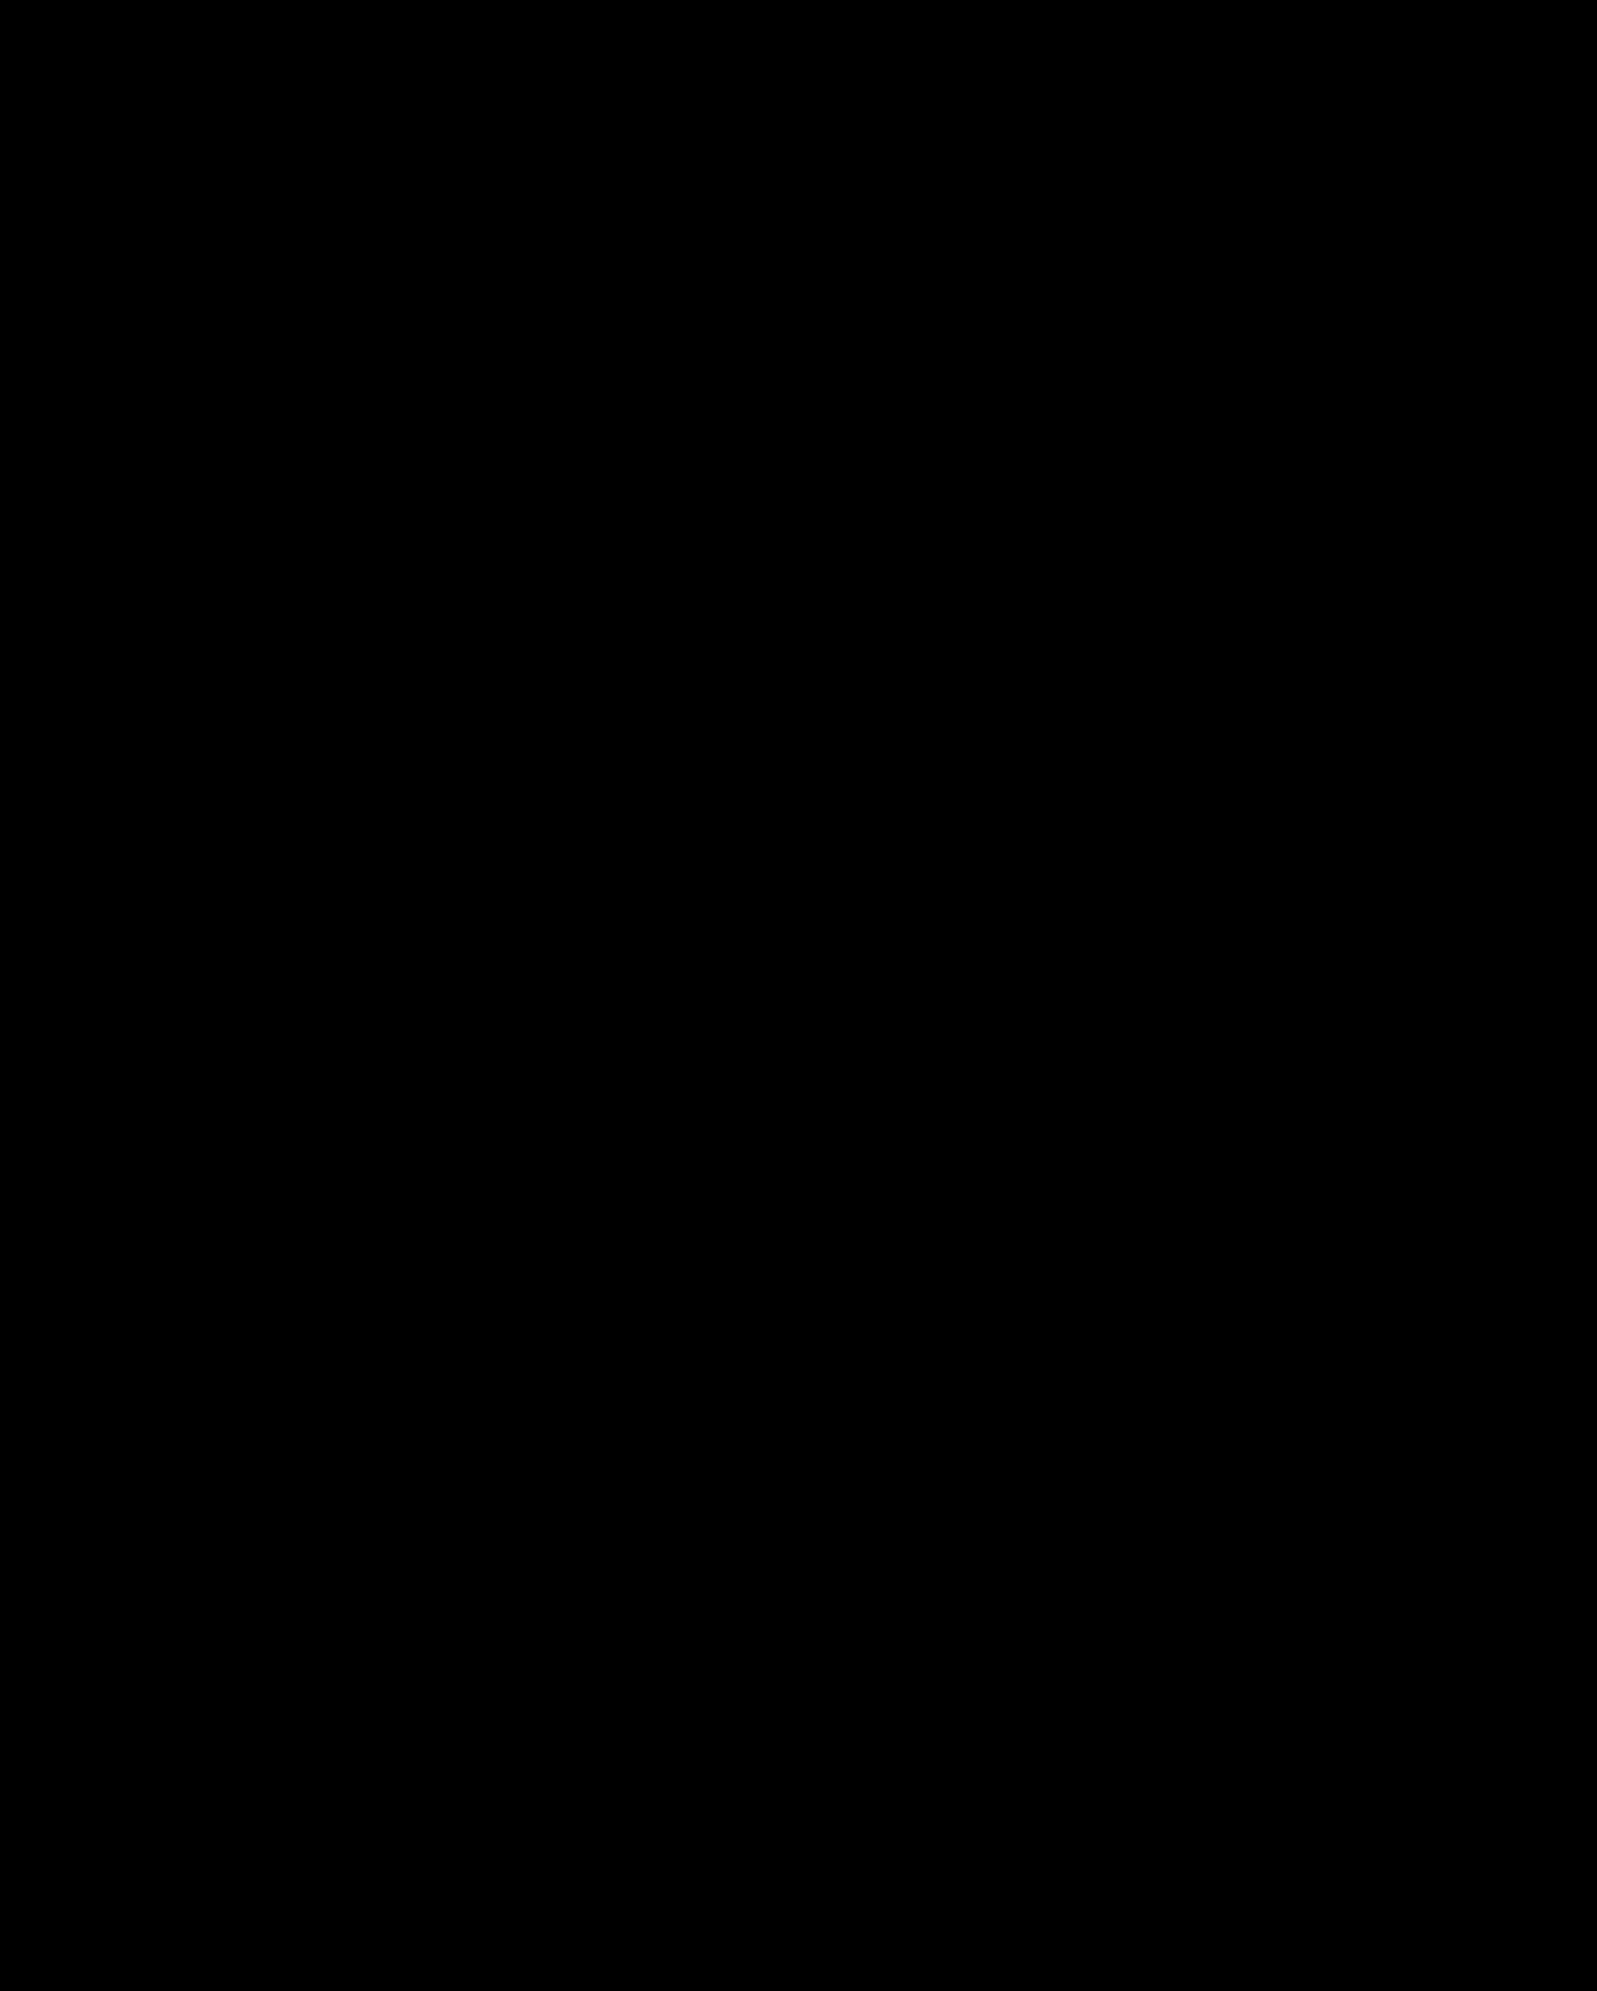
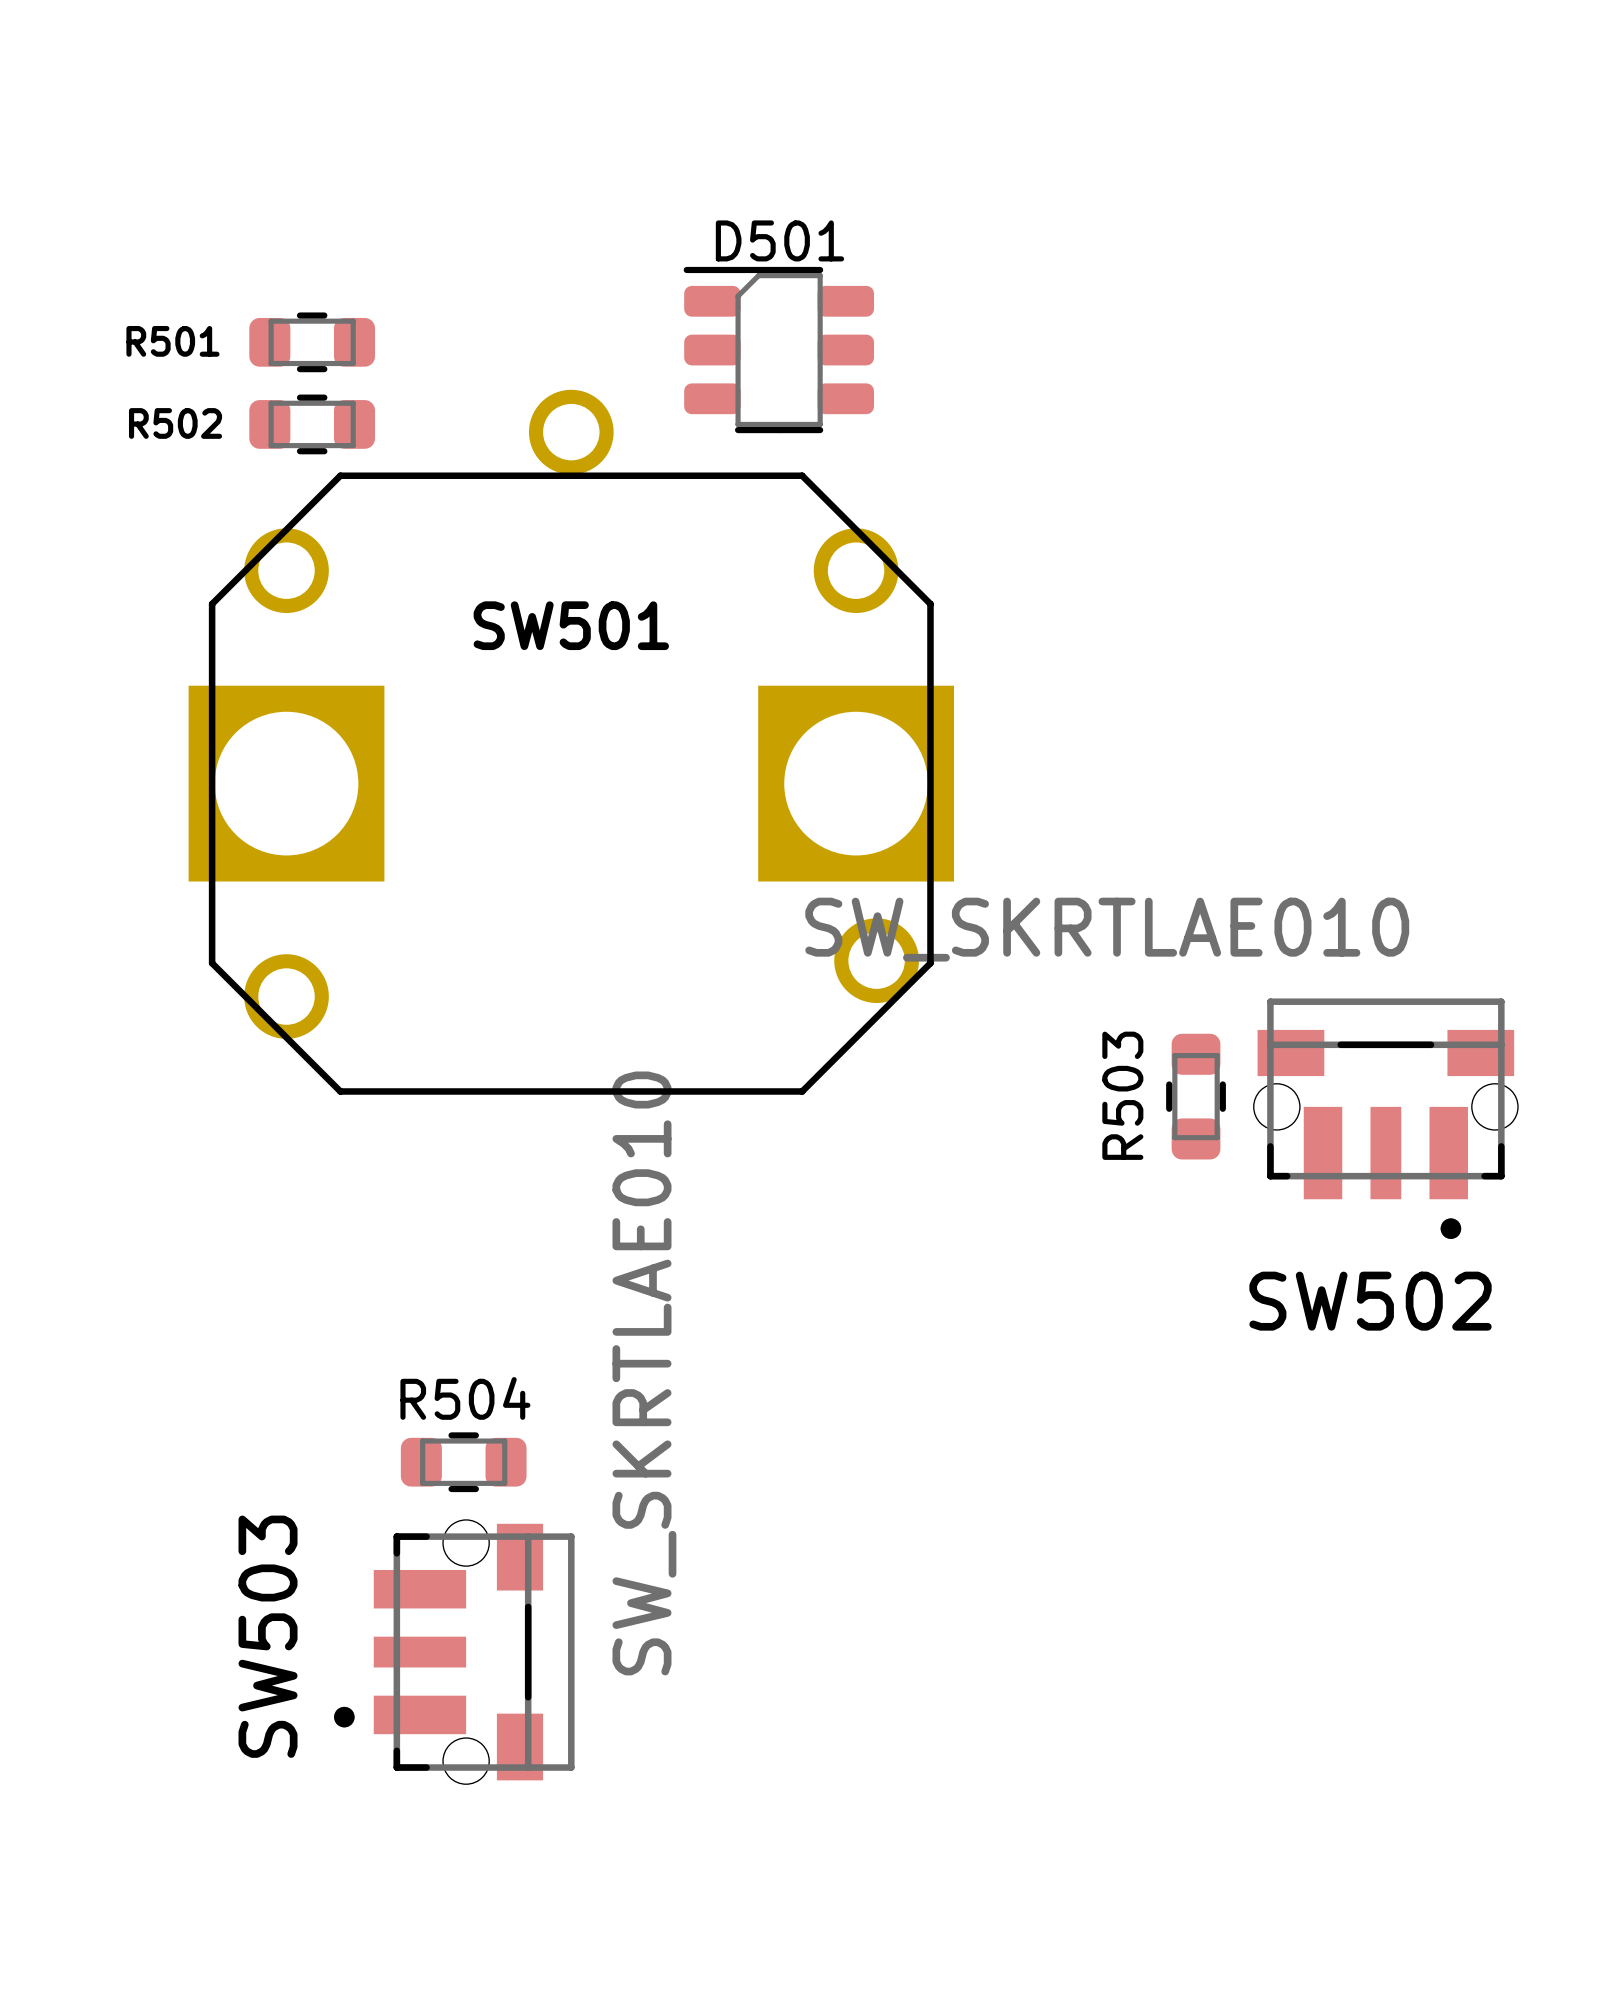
R501: none -> (312, 342)
D501: none -> (778, 350)
R502: none -> (312, 424)
SW501: none -> (571, 742)
R503: none -> (1196, 1096)
SW502: none -> SW_SKRTLAE010 (1385, 1118)
R504: none -> (463, 1462)
SW503: none -> SW_SKRTLAE010 (454, 1652)

